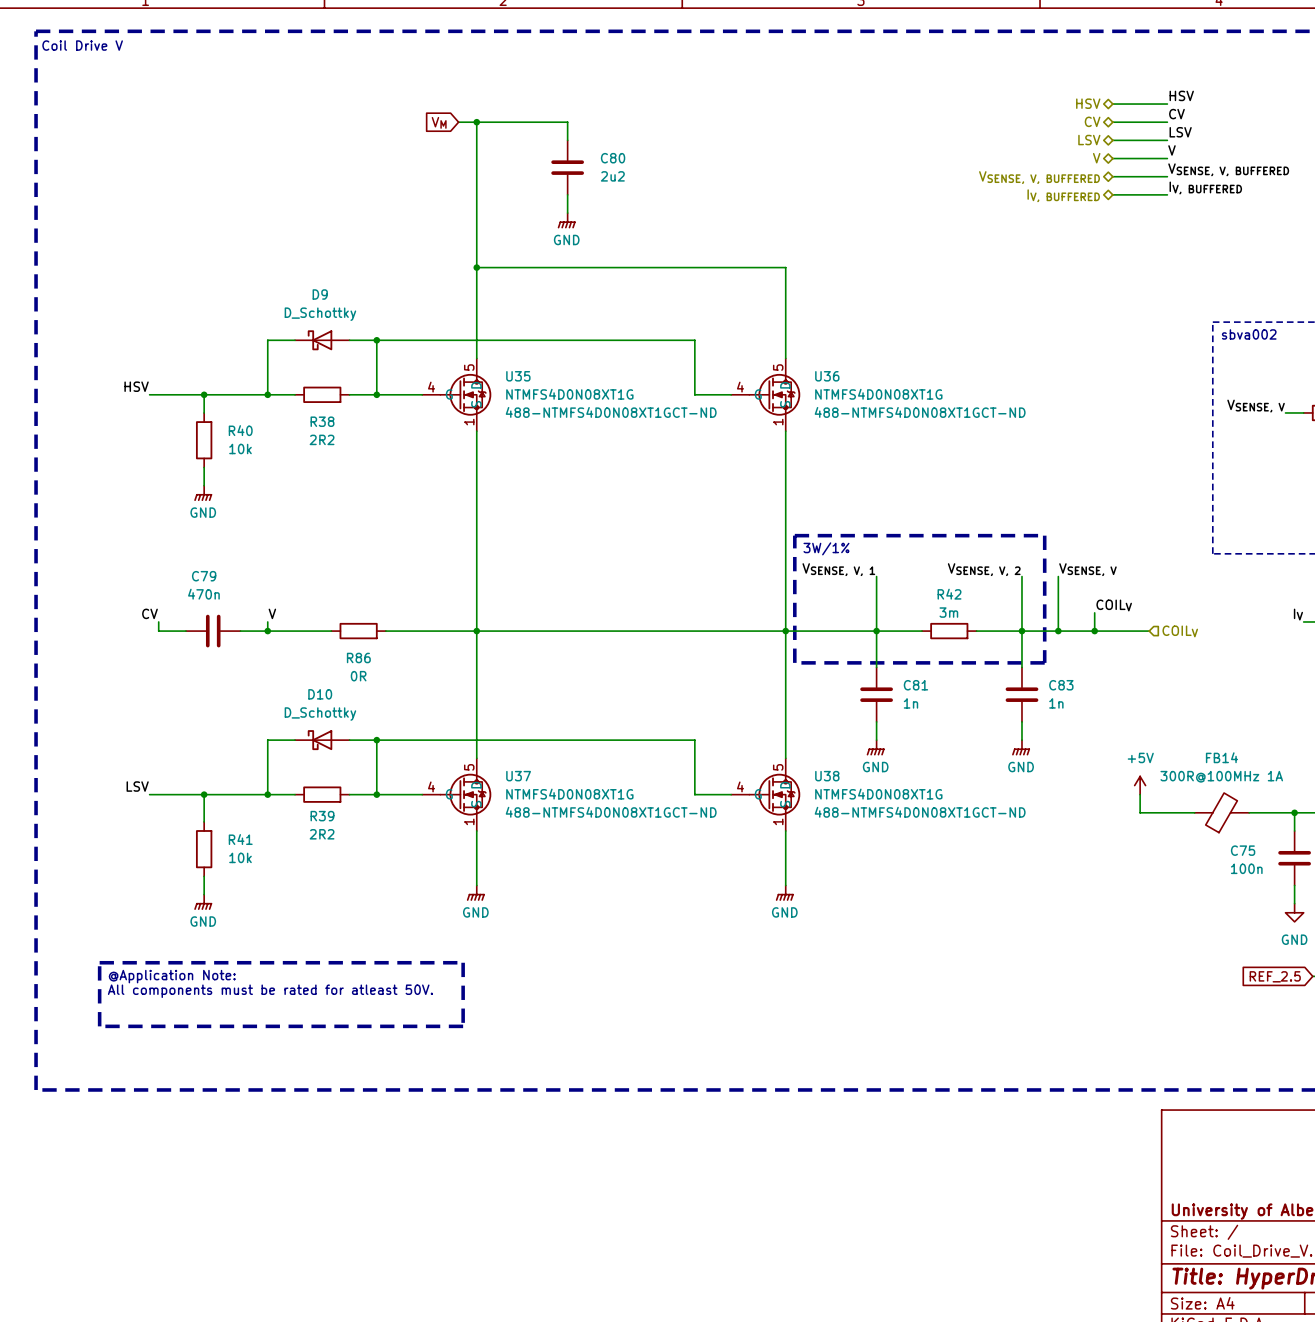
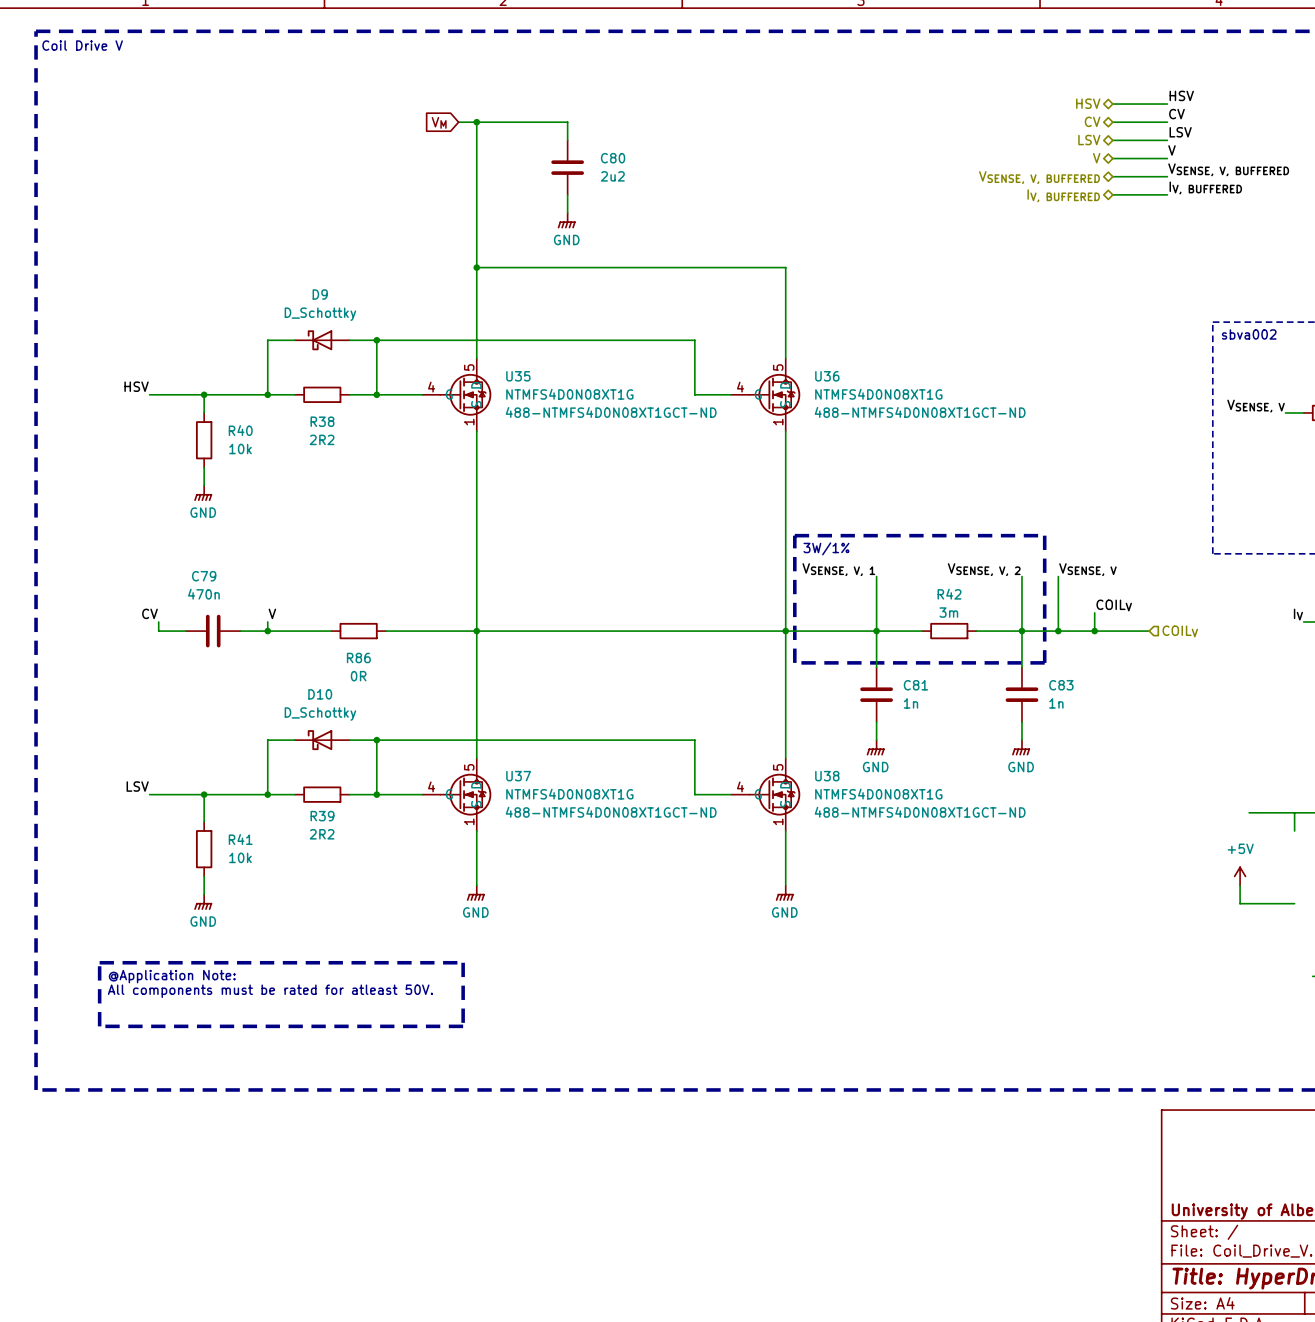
power symbol position: +5V (1140, 785) -> +5V (1240, 876)
wire: (1140, 794) (1140, 812) (1194, 812) -> none
FB14: 300R@100MHz 1A (1221, 812) -> none
junction: (1294, 812) -> none
C75: 100n (1294, 858) -> none
wire: (1294, 885) (1294, 903) -> (1240, 885) (1240, 903) (1294, 903)
power symbol: GND (1294, 912) -> none
global label: REF_2.5 (1275, 976) -> none

